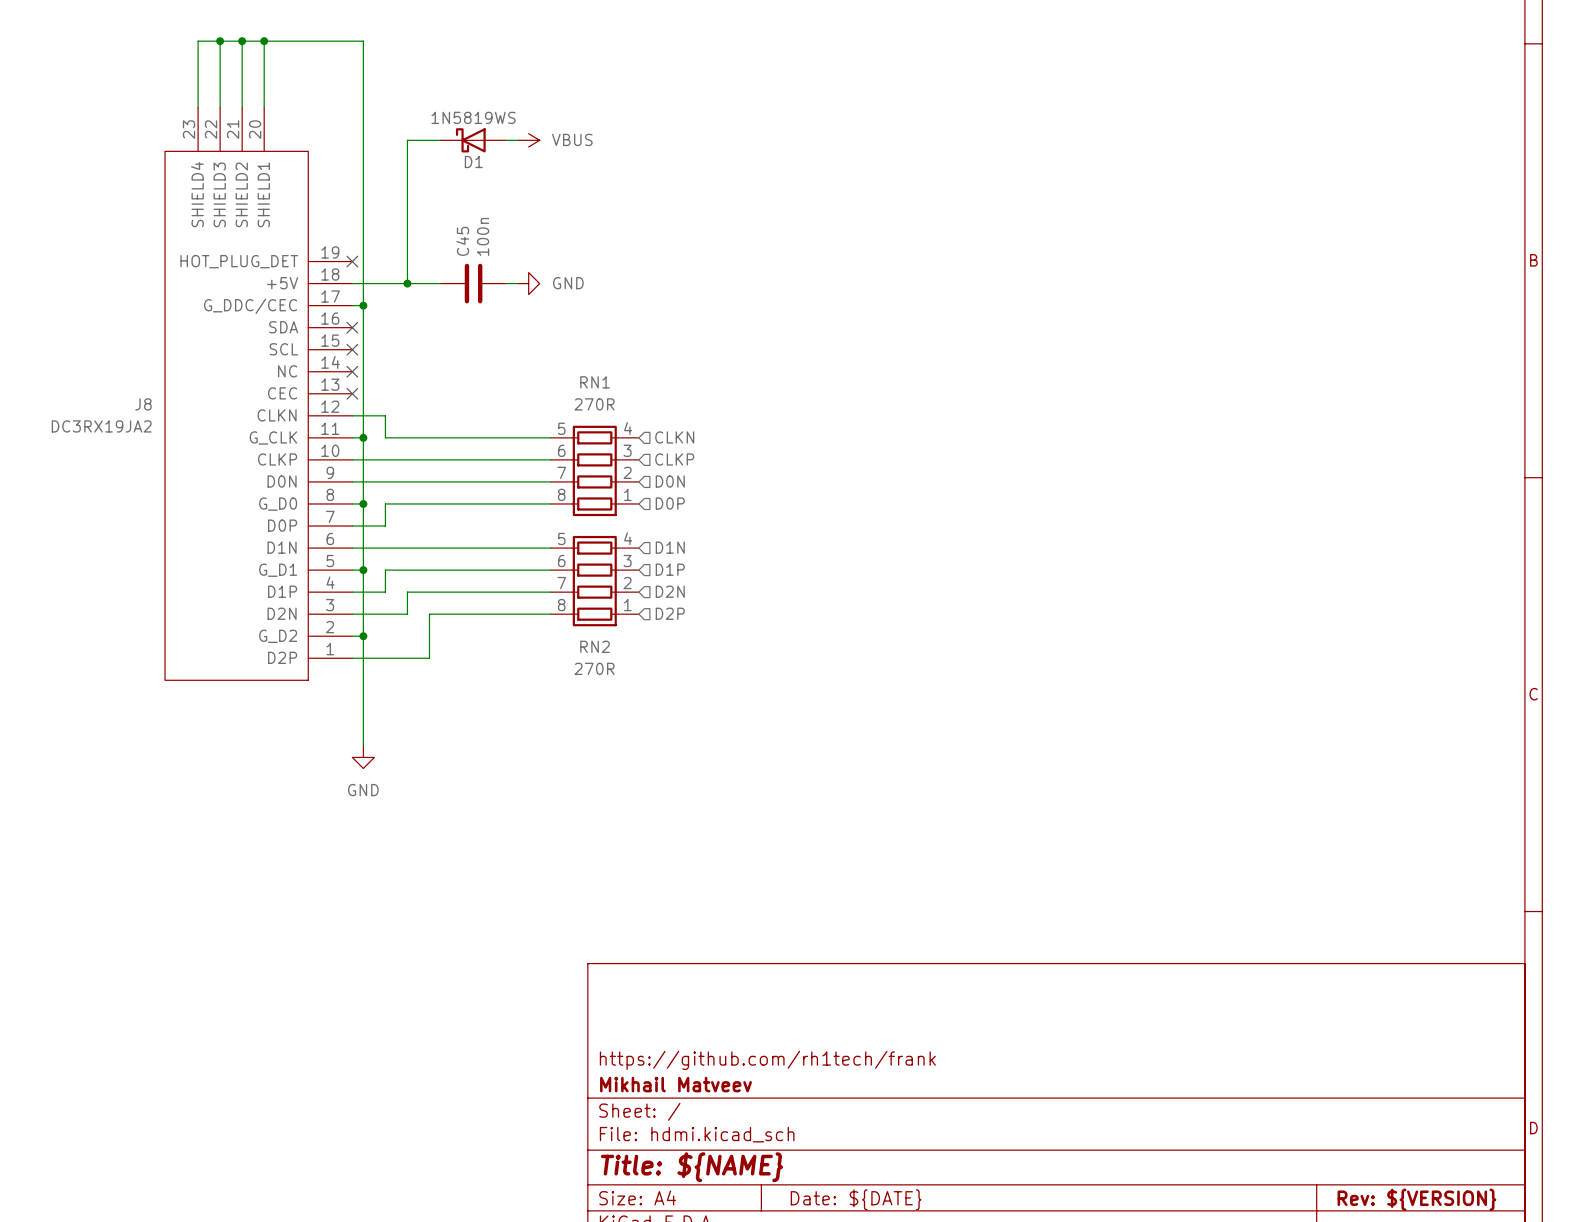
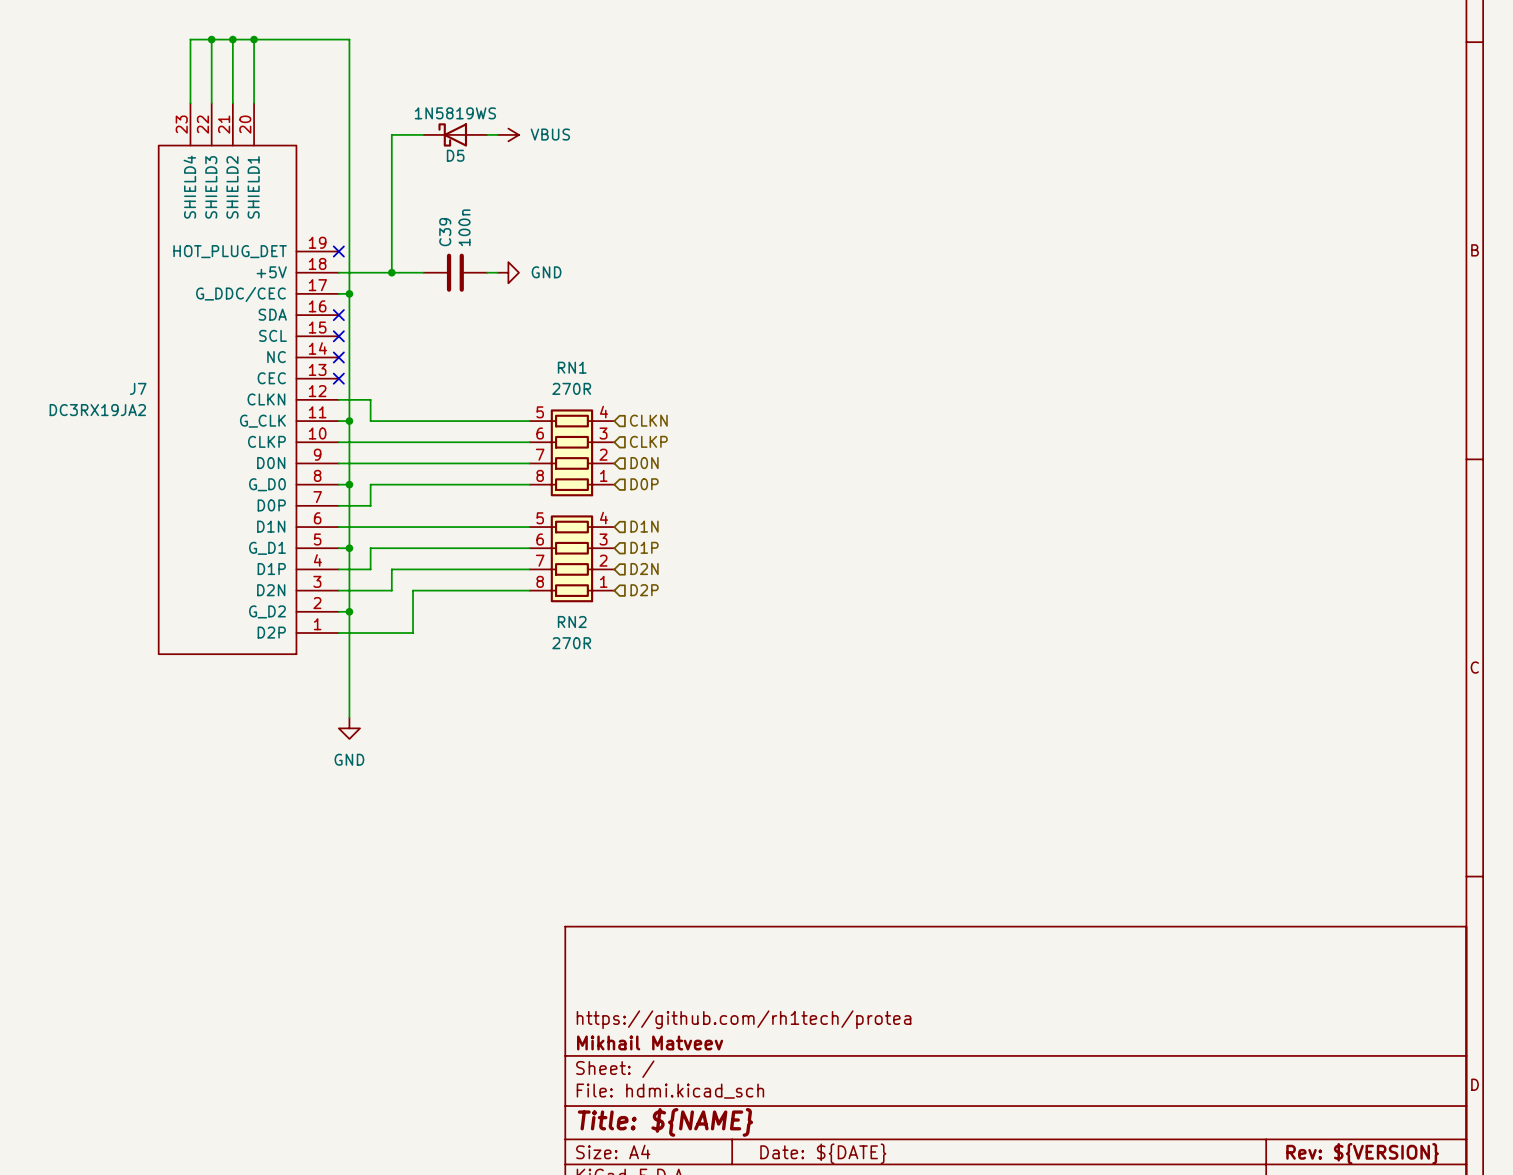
D1 name: D1 (473, 161) -> D5 (455, 155)
C45 name: C45 (462, 241) -> C39 (445, 232)
J8 name: J8 (143, 404) -> J7 (138, 388)
title block: https://github.com/rh1tech/frank (767, 1060) -> https://github.com/rh1tech/protea (744, 1019)

